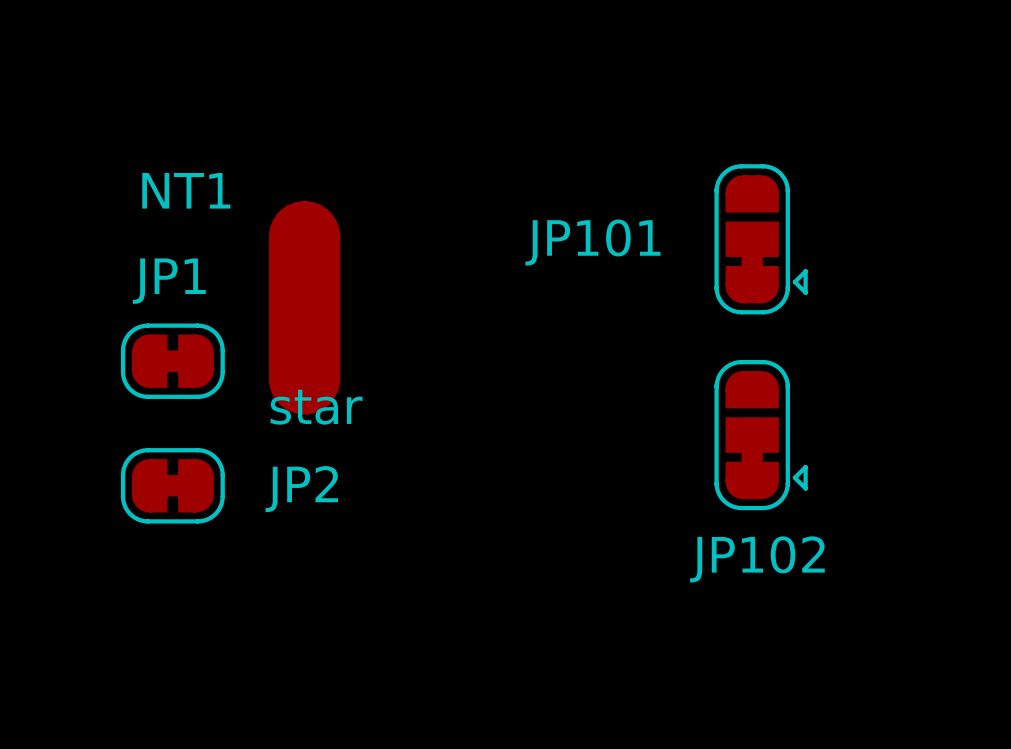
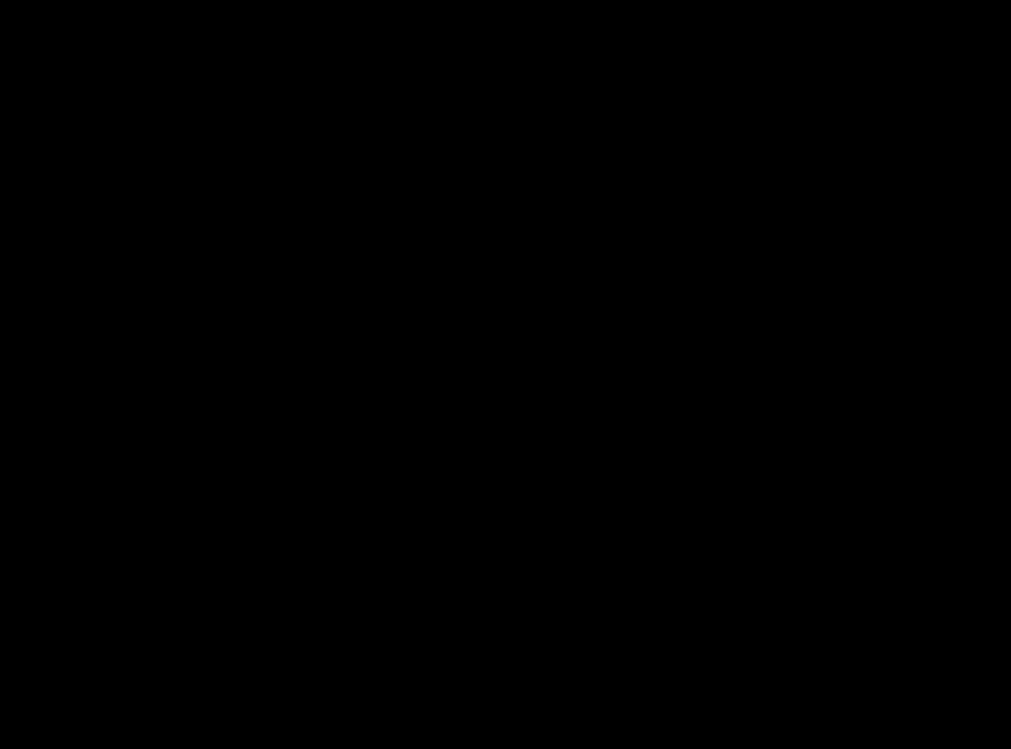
JP101: (761, 239) -> none
NT1: (304, 307) -> none
JP1: (172, 361) -> none
text: star (316, 407) -> none
JP102: (761, 435) -> none
JP2: (172, 485) -> none

